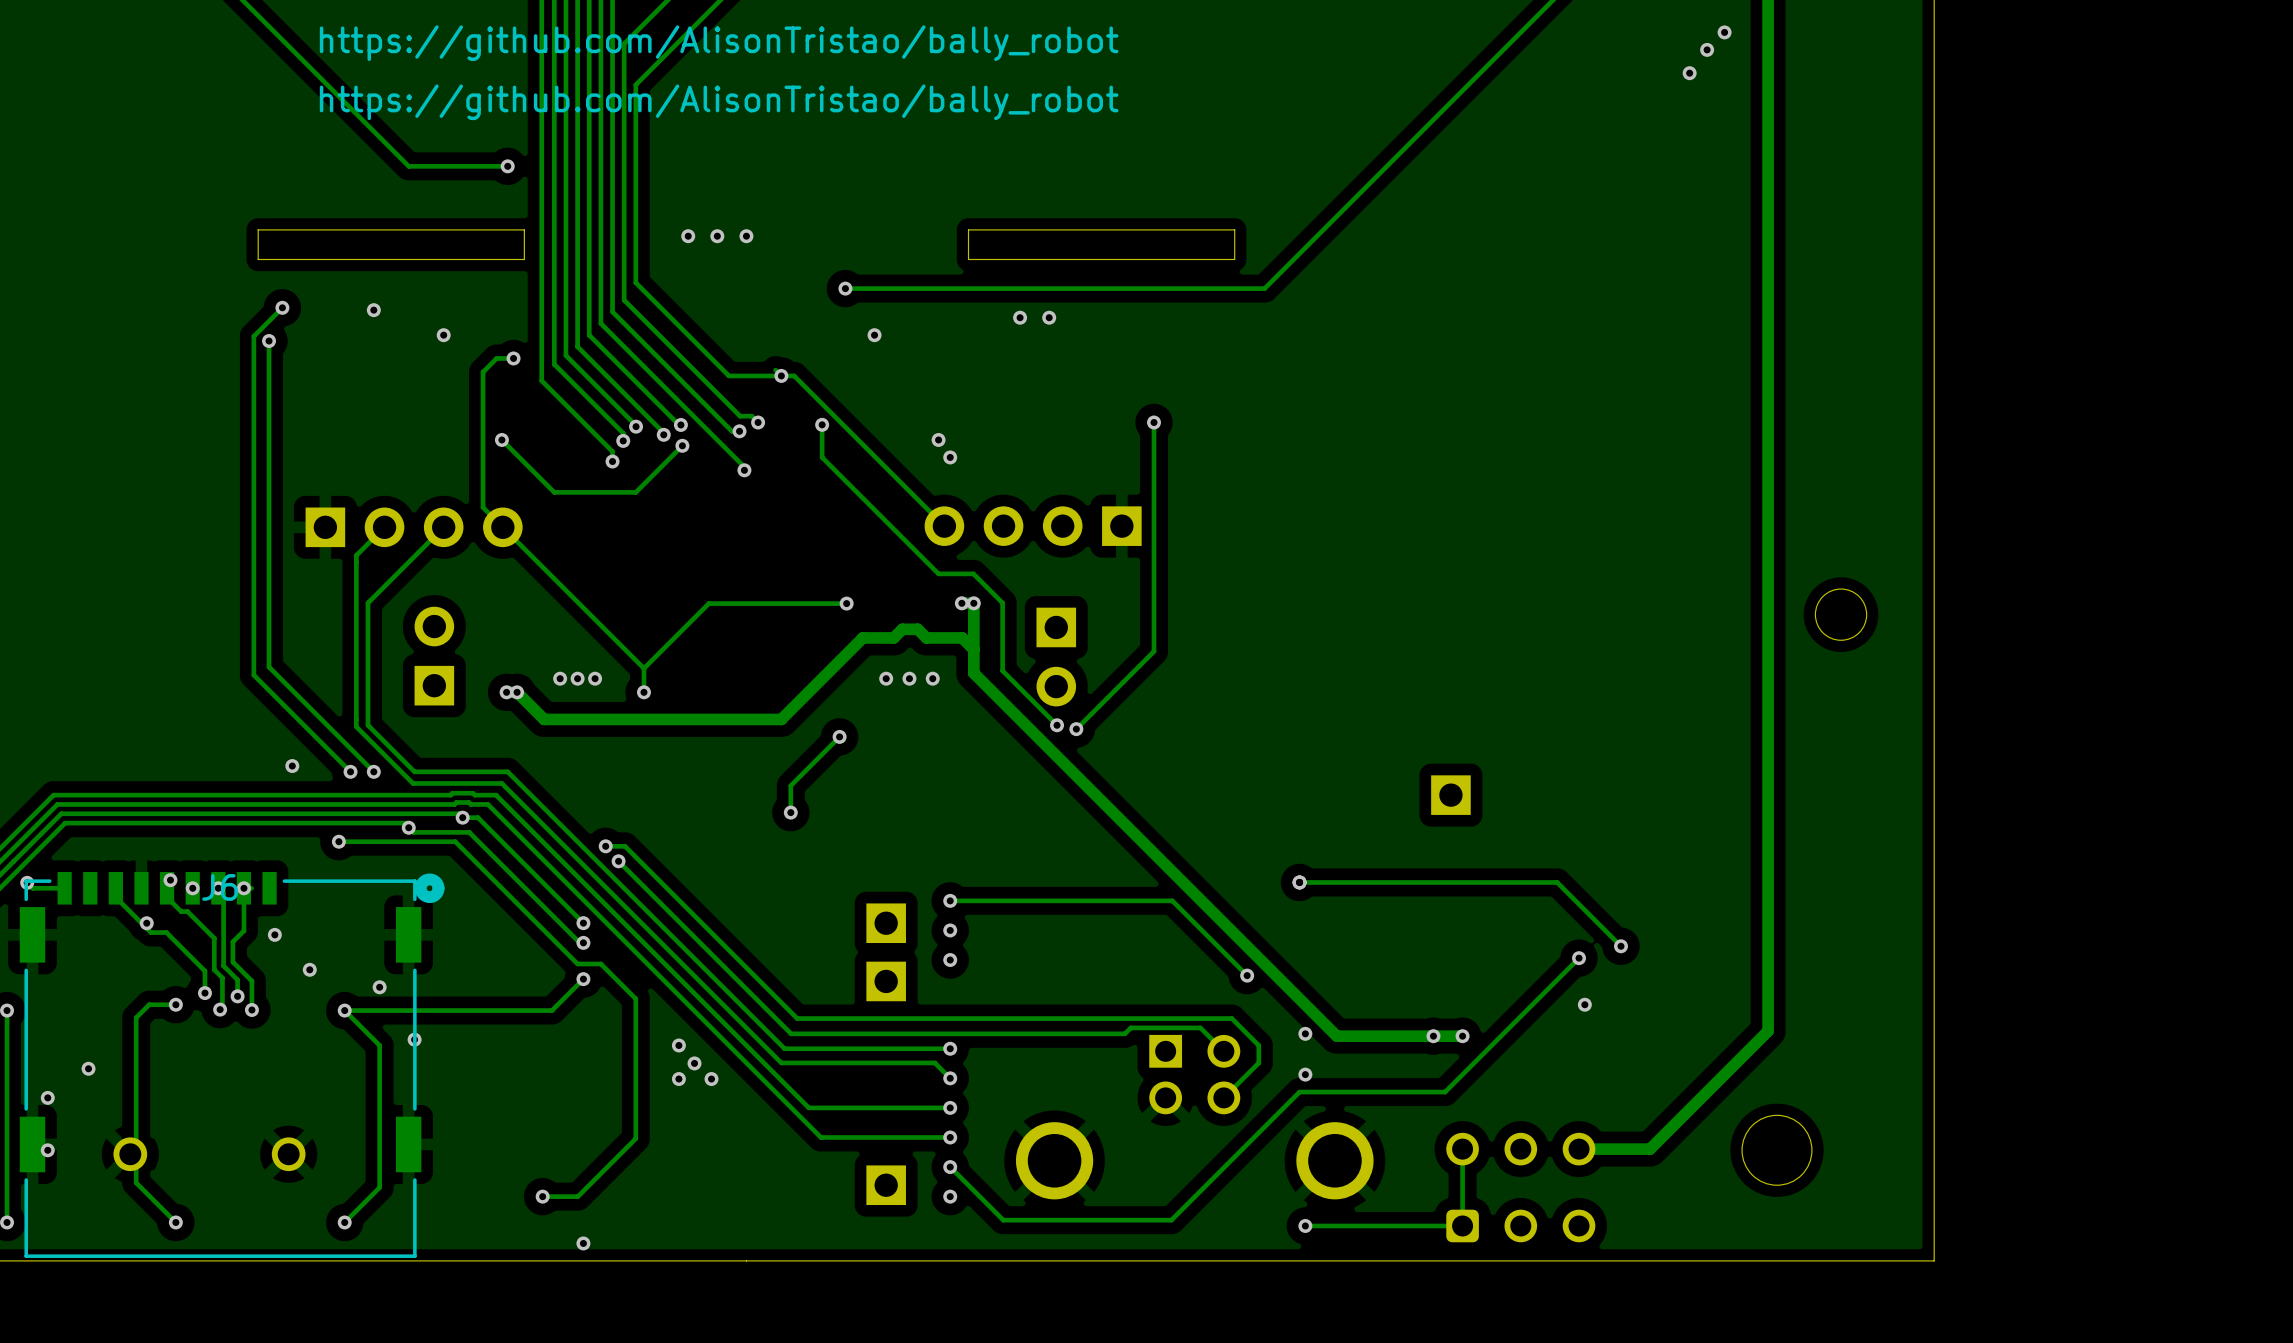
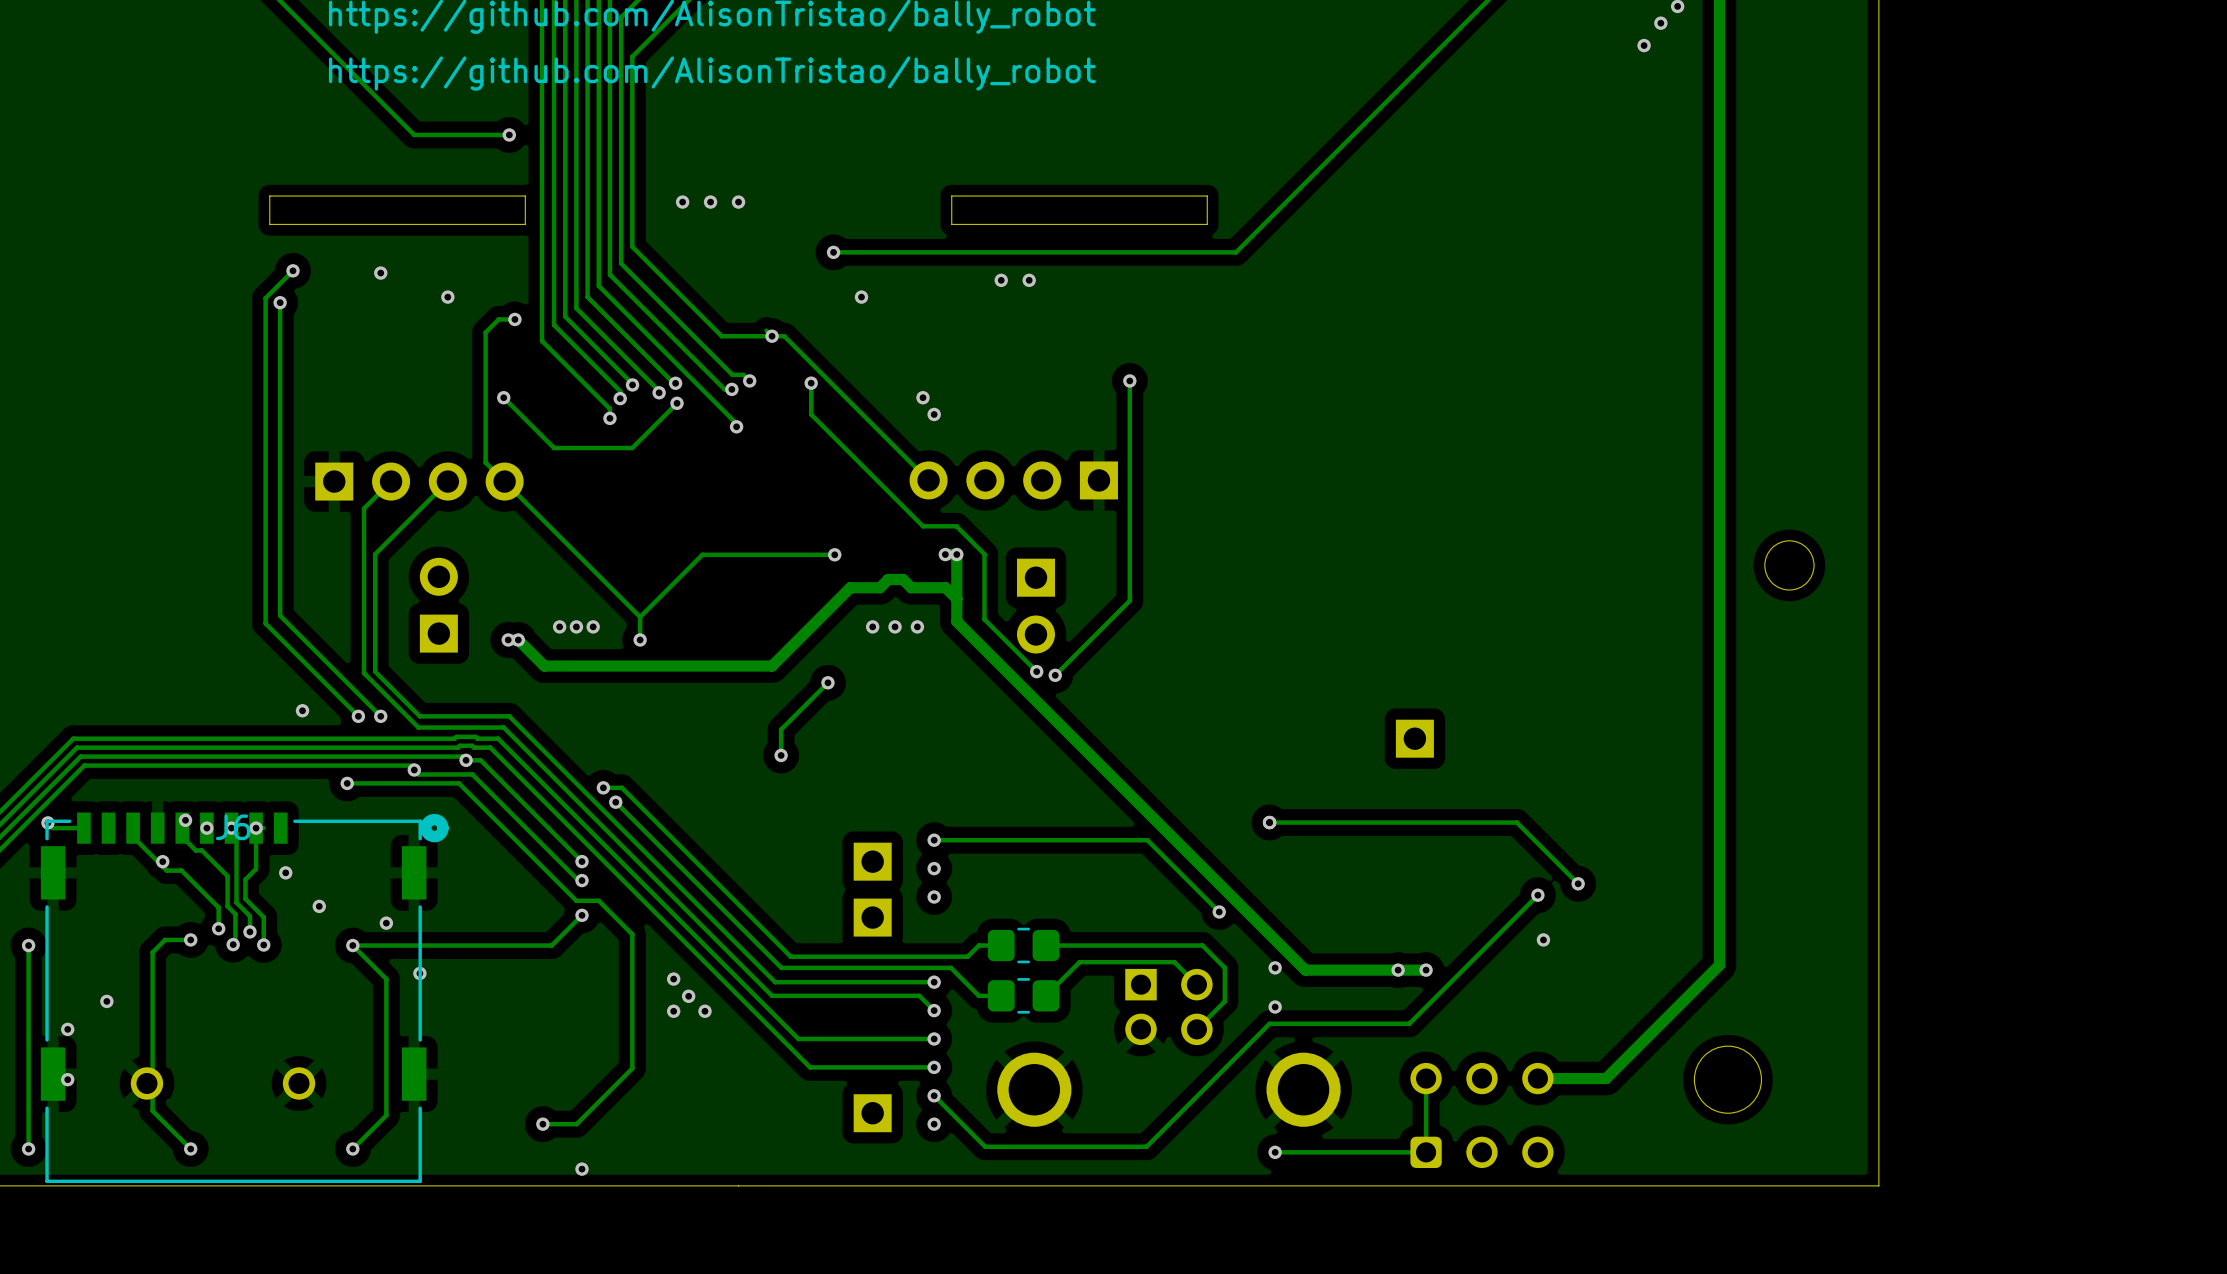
part: none -> (1023, 945)
track: none -> (1045, 945) (1202, 945) (1224, 967) (1224, 1001)
track: (797, 1018) (1231, 1018) (1258, 1045) (1258, 1062) (1252, 1068) -> (787, 953) (790, 956) (967, 956) (978, 945) (1001, 945)
track: (1130, 1027) (1124, 1033) (967, 1033) -> (1107, 962) (1079, 962) (1045, 995)
track: none -> (950, 967) (978, 995) (1001, 995)
part: none -> (1023, 995)

